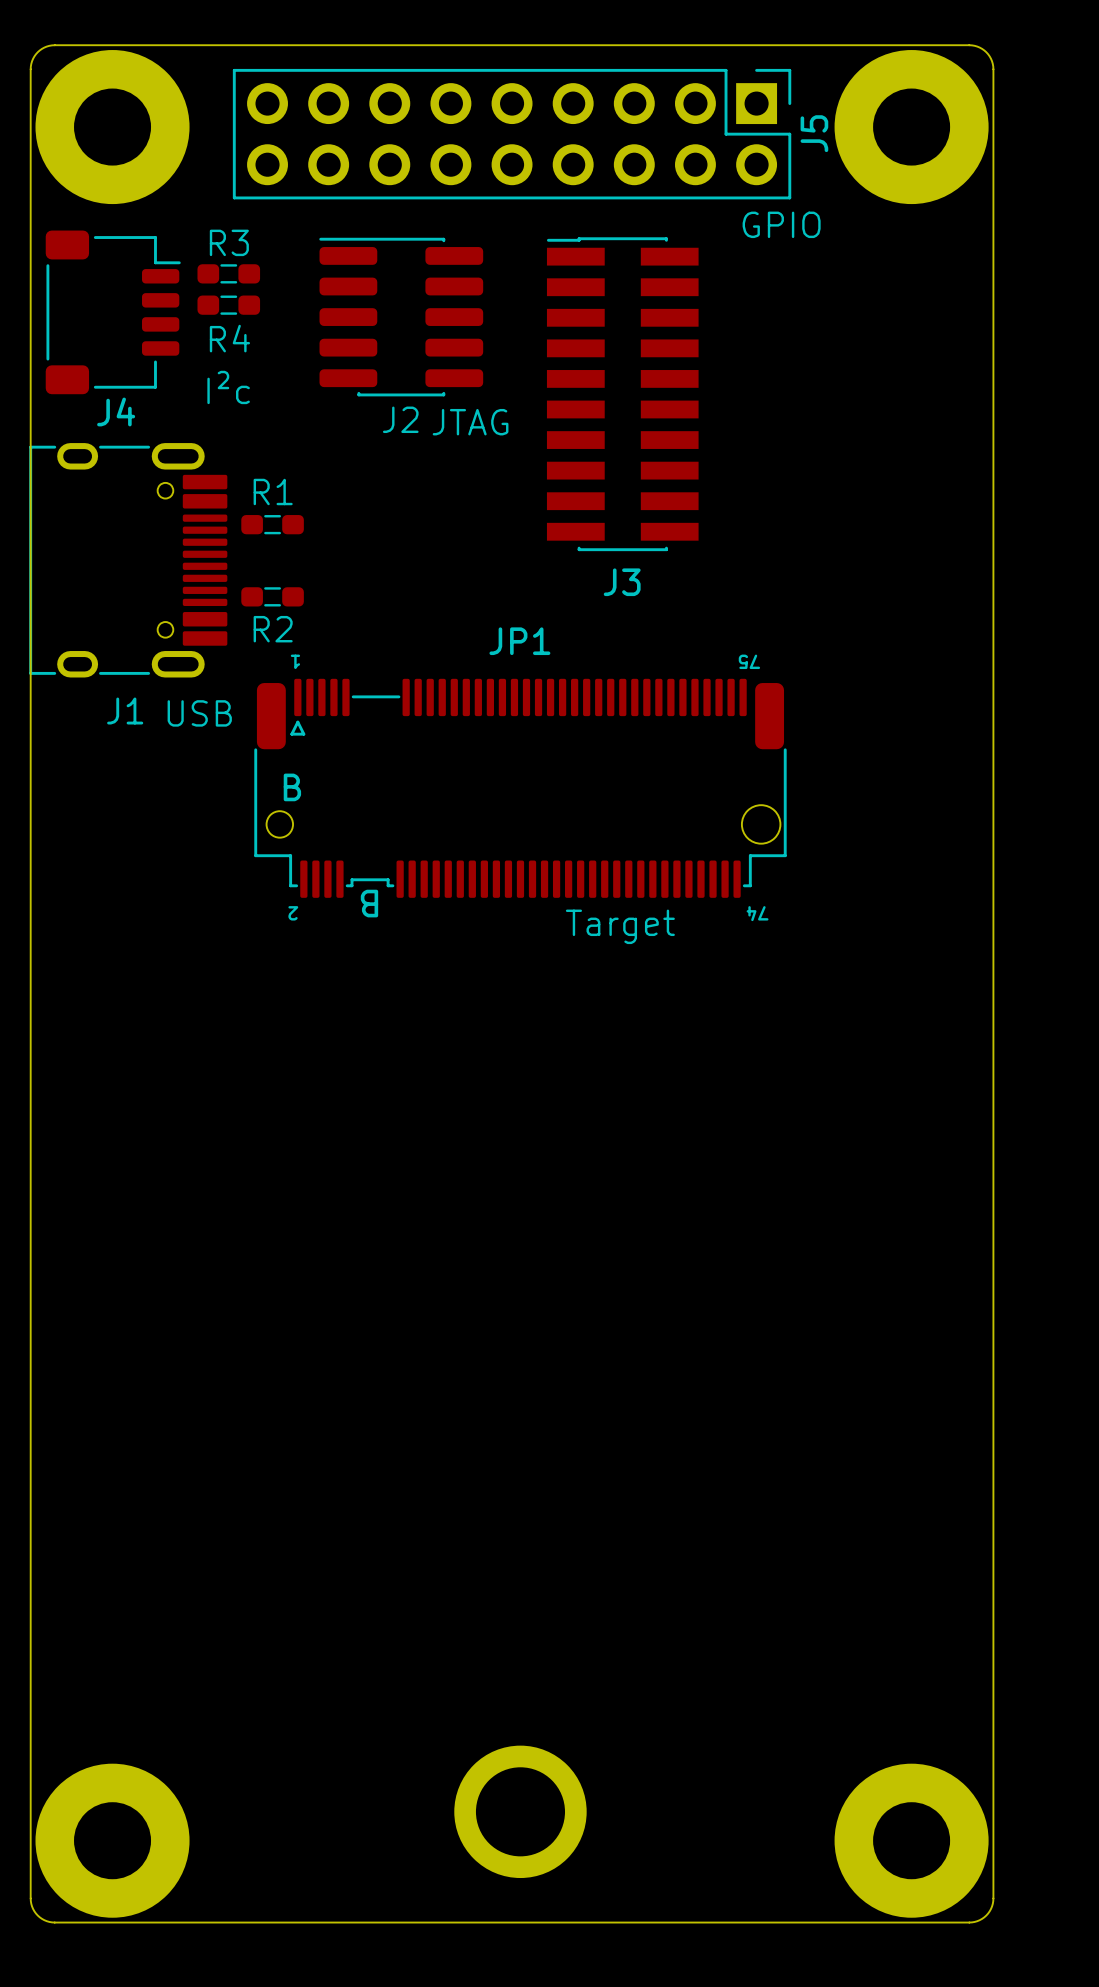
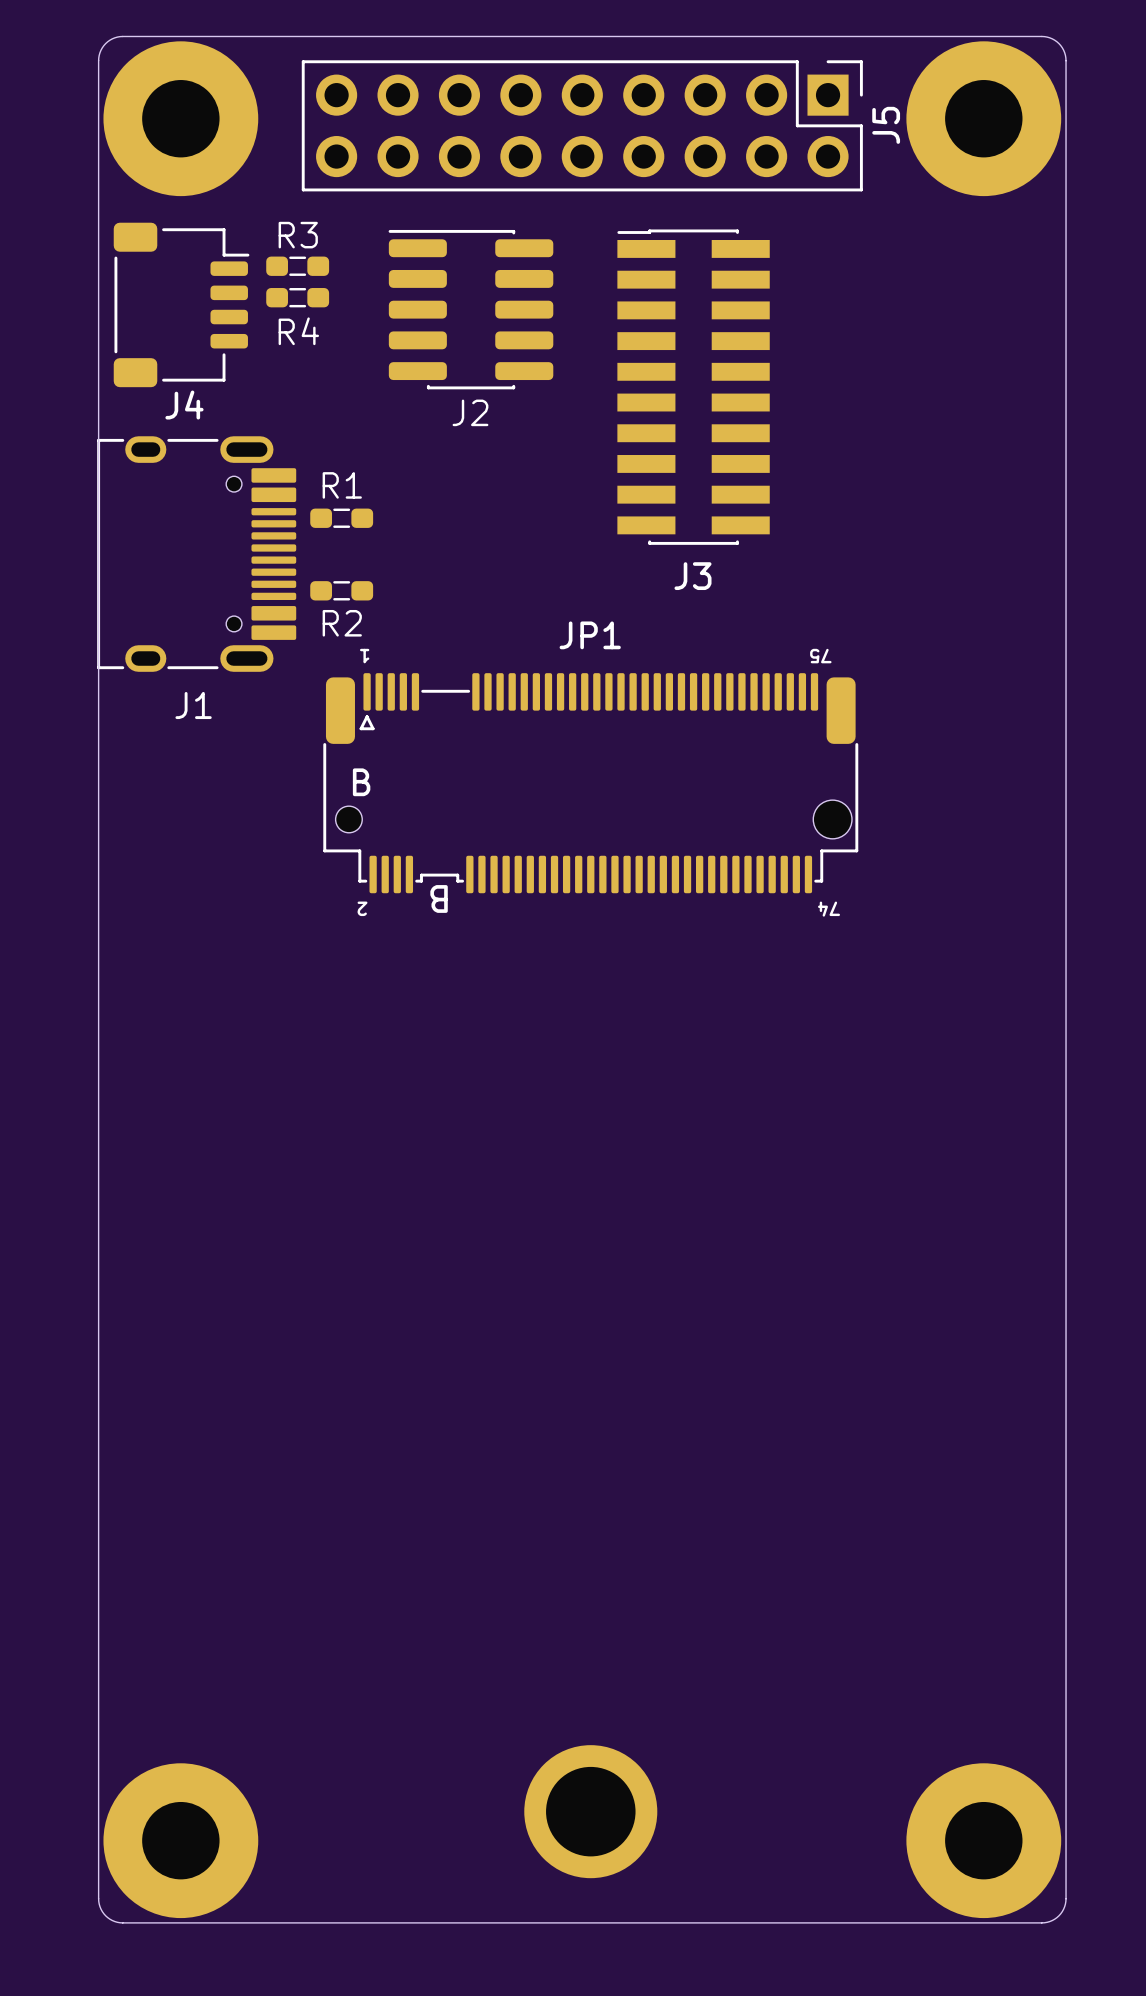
text: GPIO (781, 224) -> none
text: I²c (228, 387) -> none
text: JTAG (470, 422) -> none
text: USB (199, 713) -> none
text: Target (620, 926) -> none

